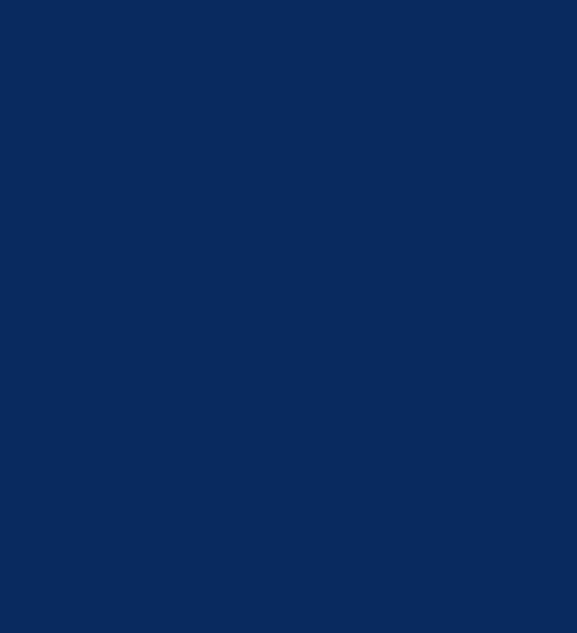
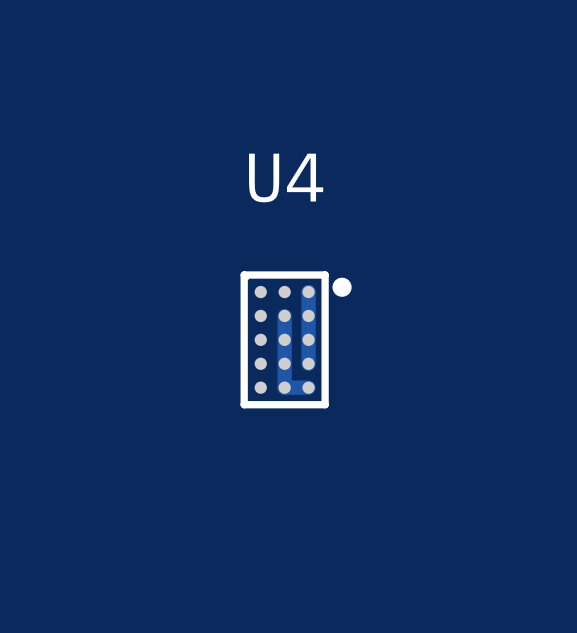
track: none -> (308, 292) (308, 363)
track: none -> (284, 315) (284, 387) (308, 387)
U4: none -> (296, 339)

